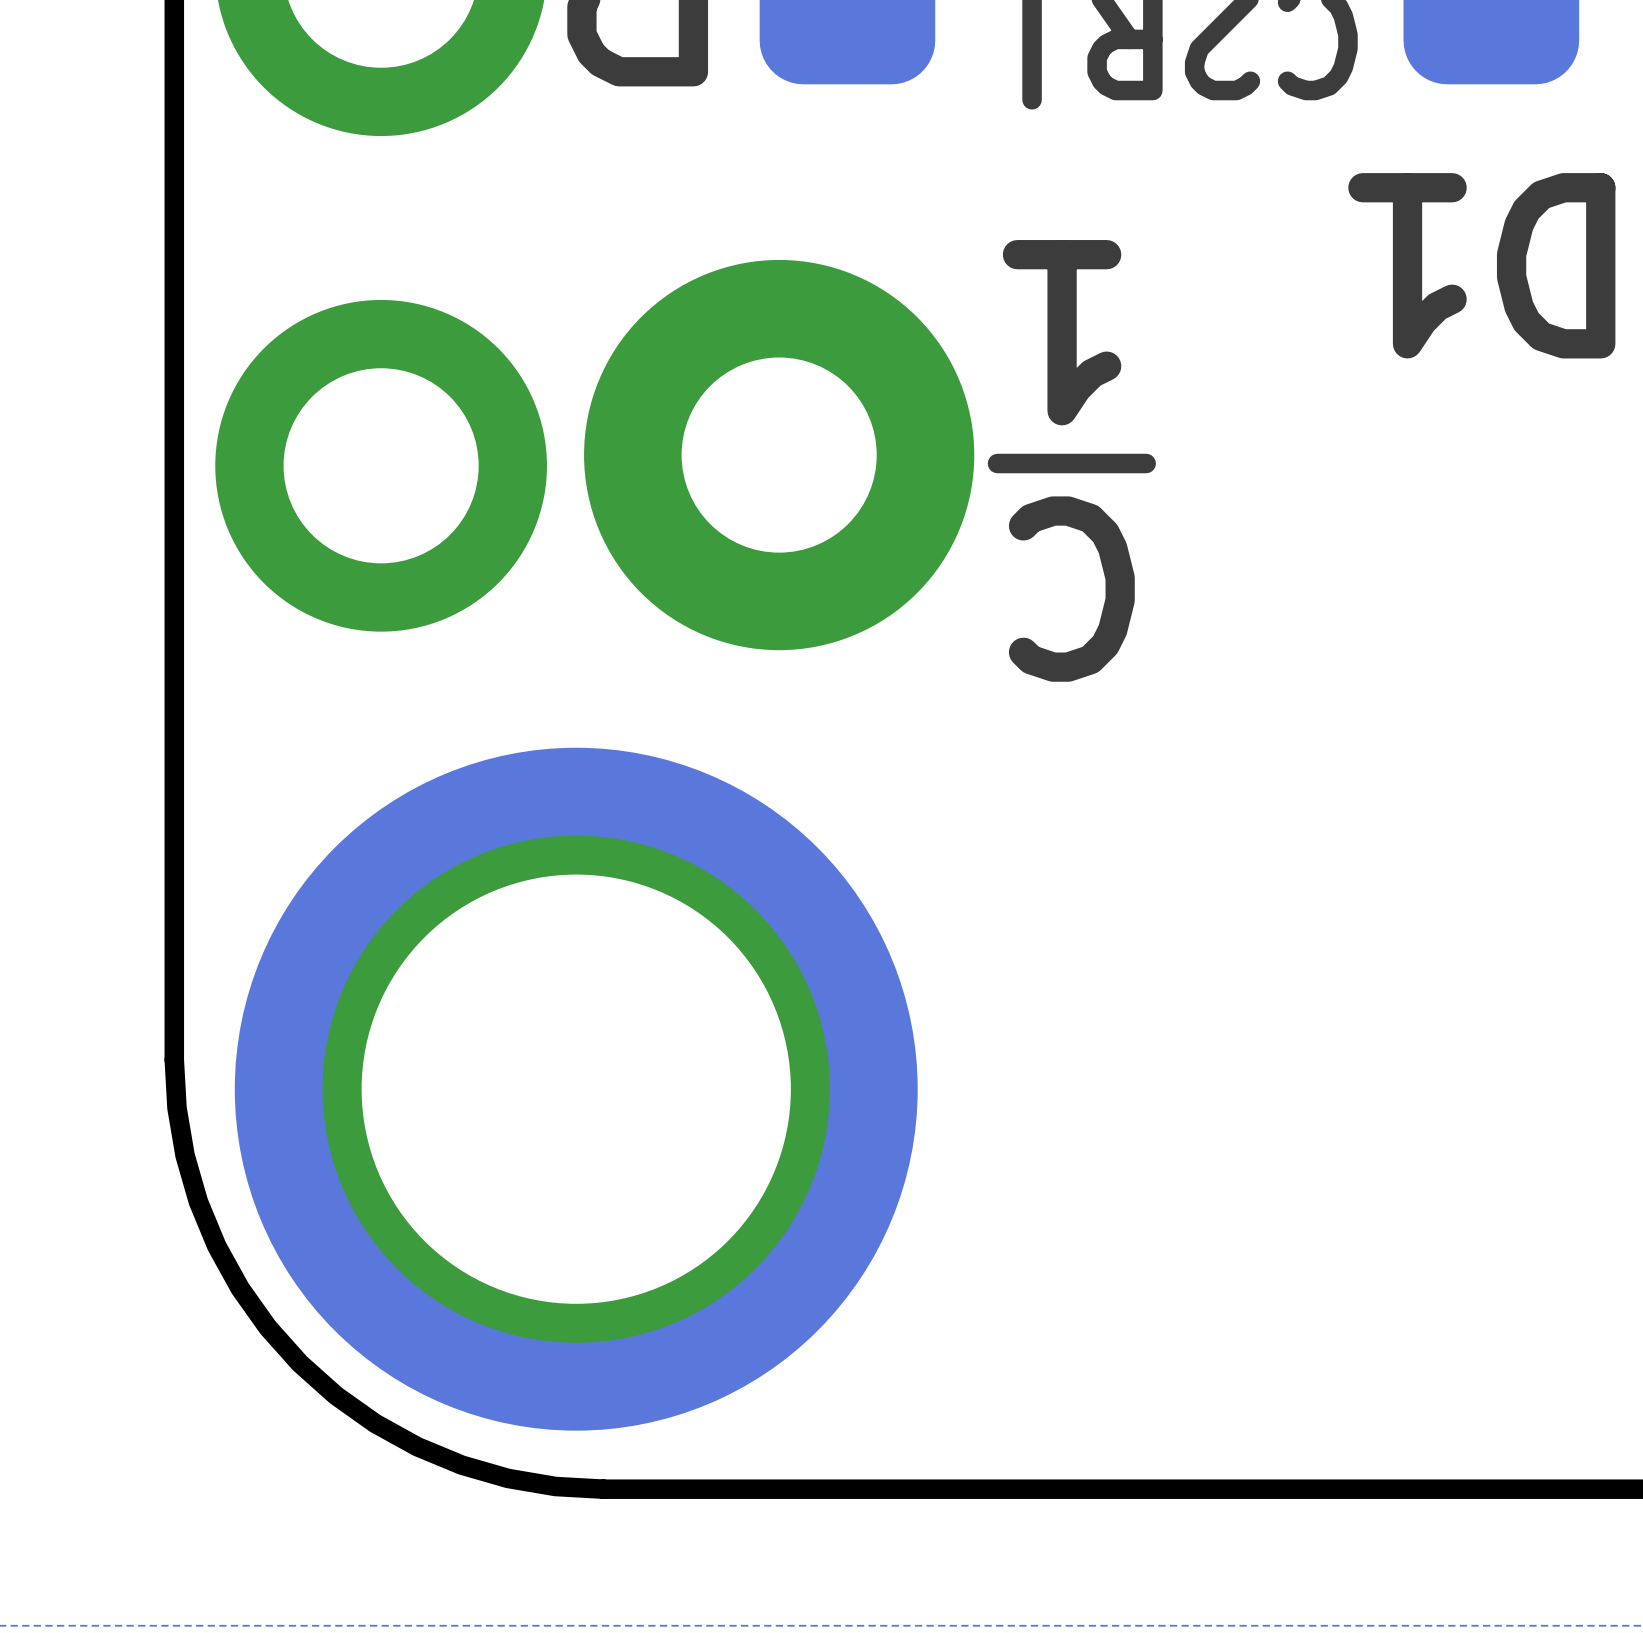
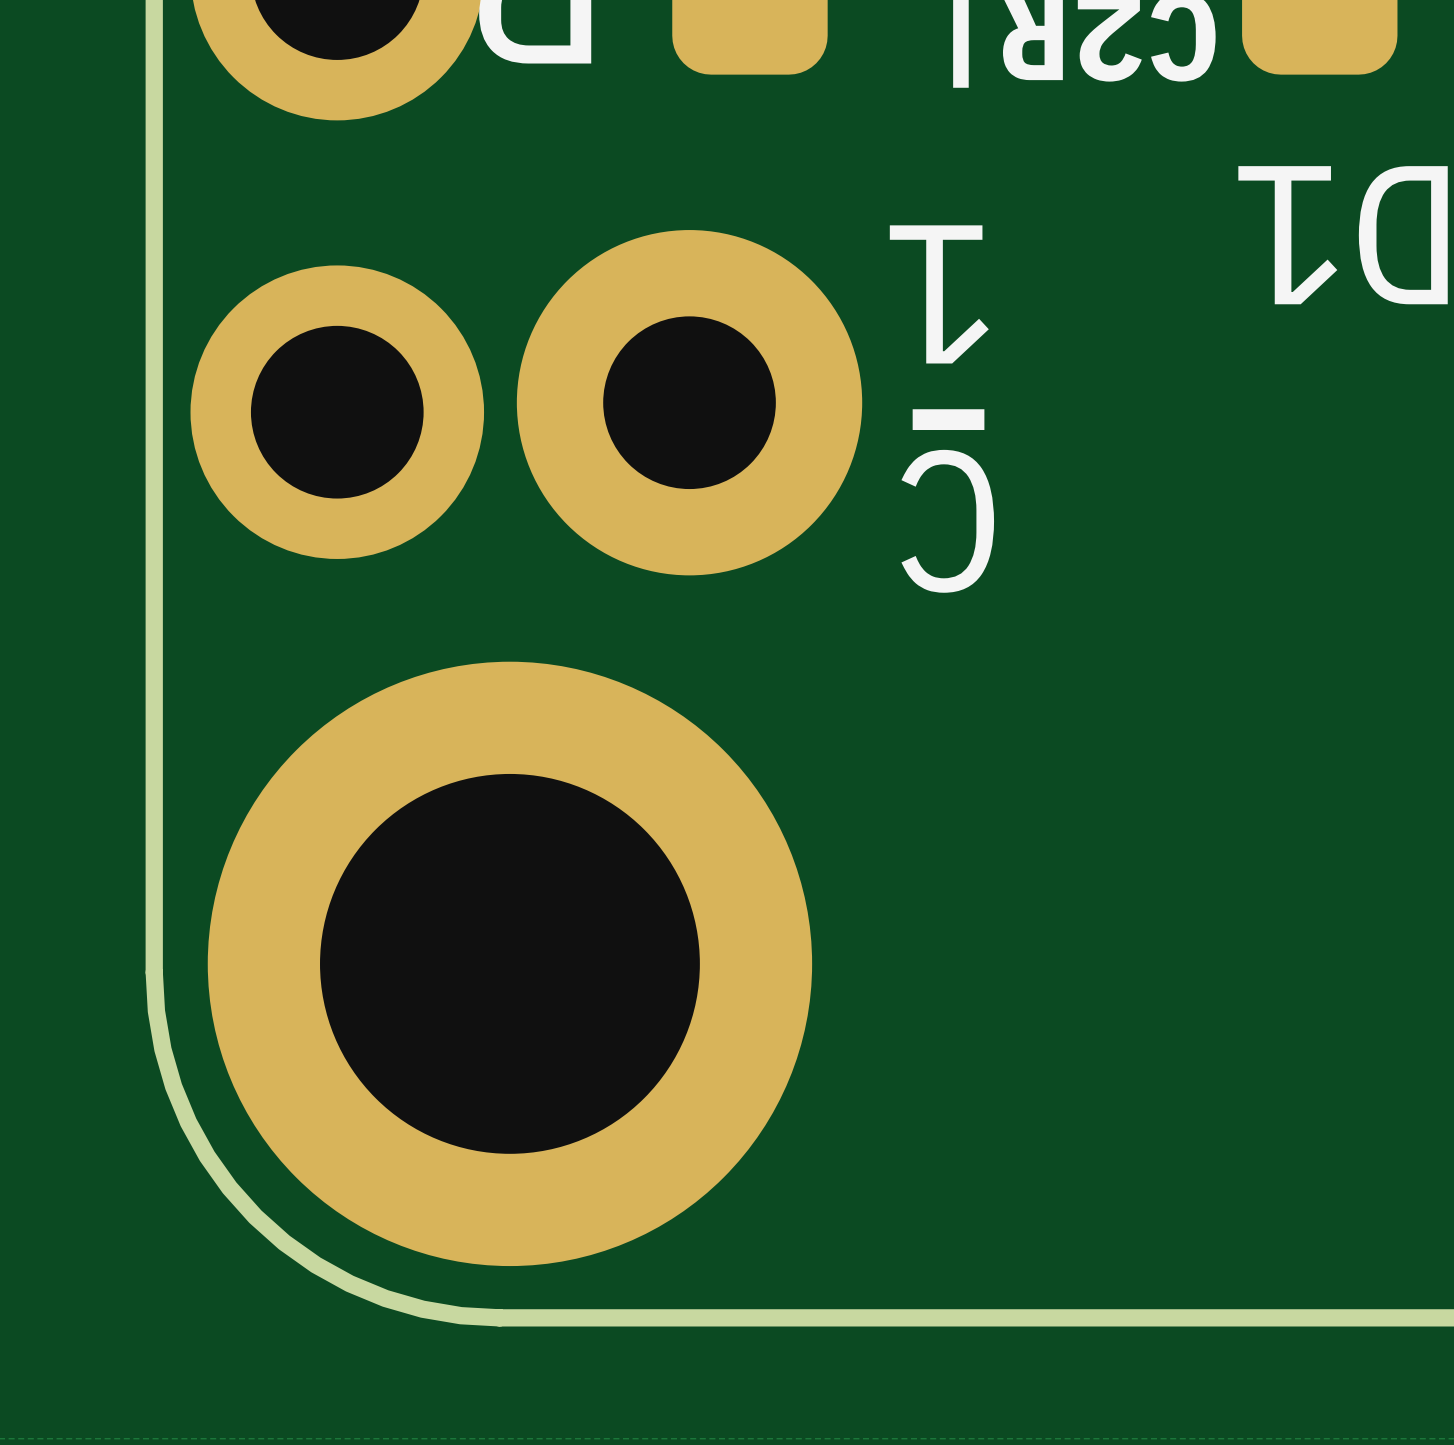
board edge: (174, 1059) (176, 1107) (185, 1155) (198, 1201) (216, 1246) (240, 1288) (267, 1327) (300, 1363) (335, 1395) (375, 1423) (417, 1446) (461, 1465) (508, 1478) (555, 1486) (603, 1489) -> (154, 937) (156, 1011) (162, 1049) (173, 1086) (188, 1122) (207, 1156) (229, 1187) (255, 1216) (284, 1242) (315, 1264) (349, 1283) (385, 1298) (422, 1309) (460, 1315) (534, 1317)

